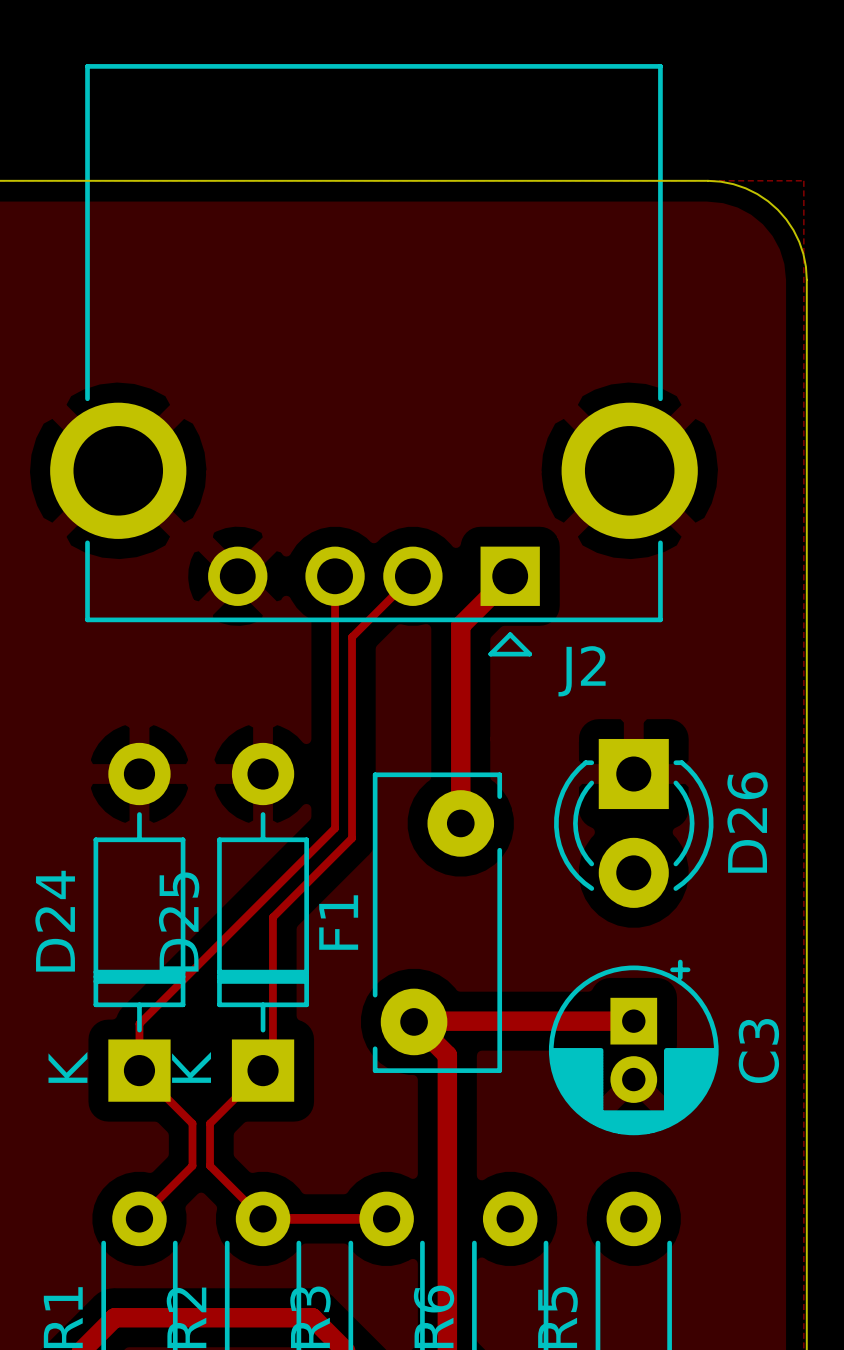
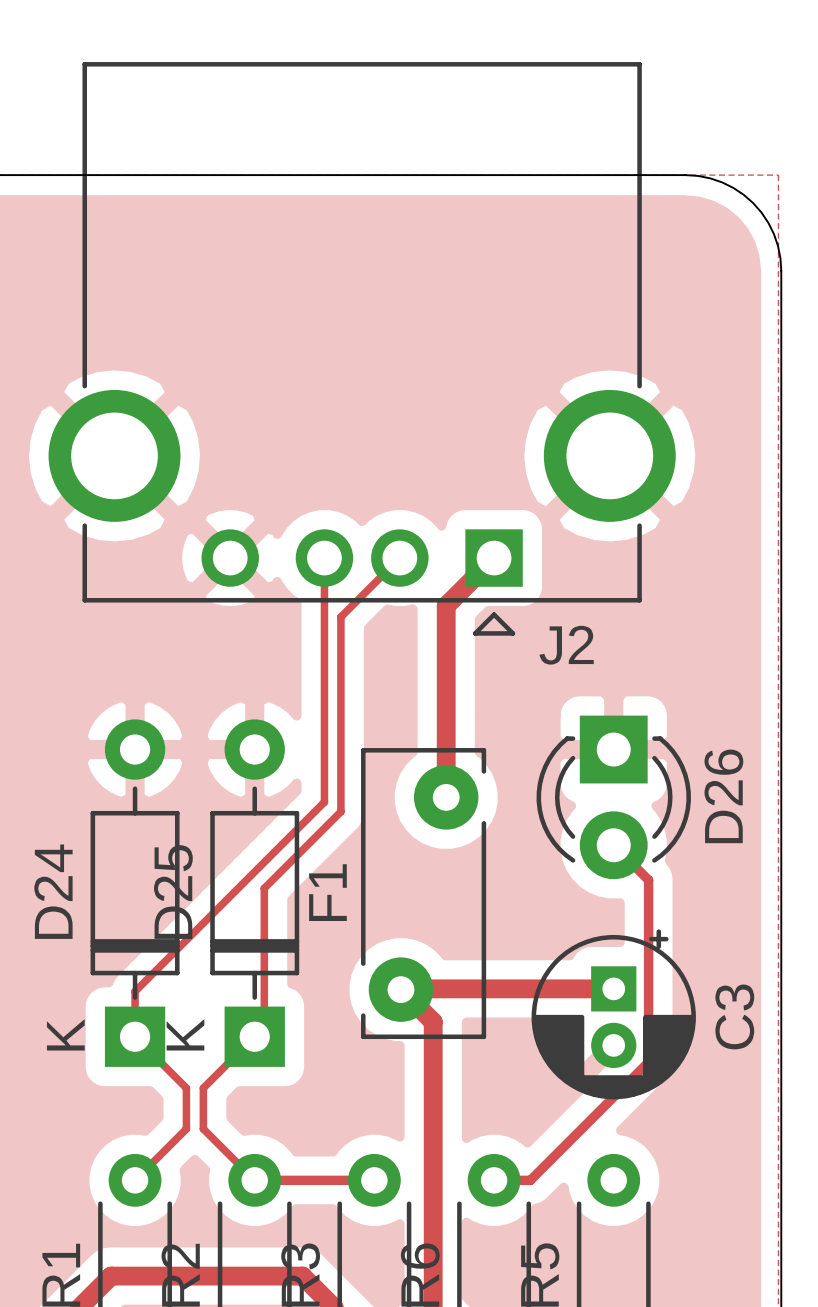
track: none -> (613, 845) (648, 880) (648, 1062) (530, 1180) (494, 1180)

